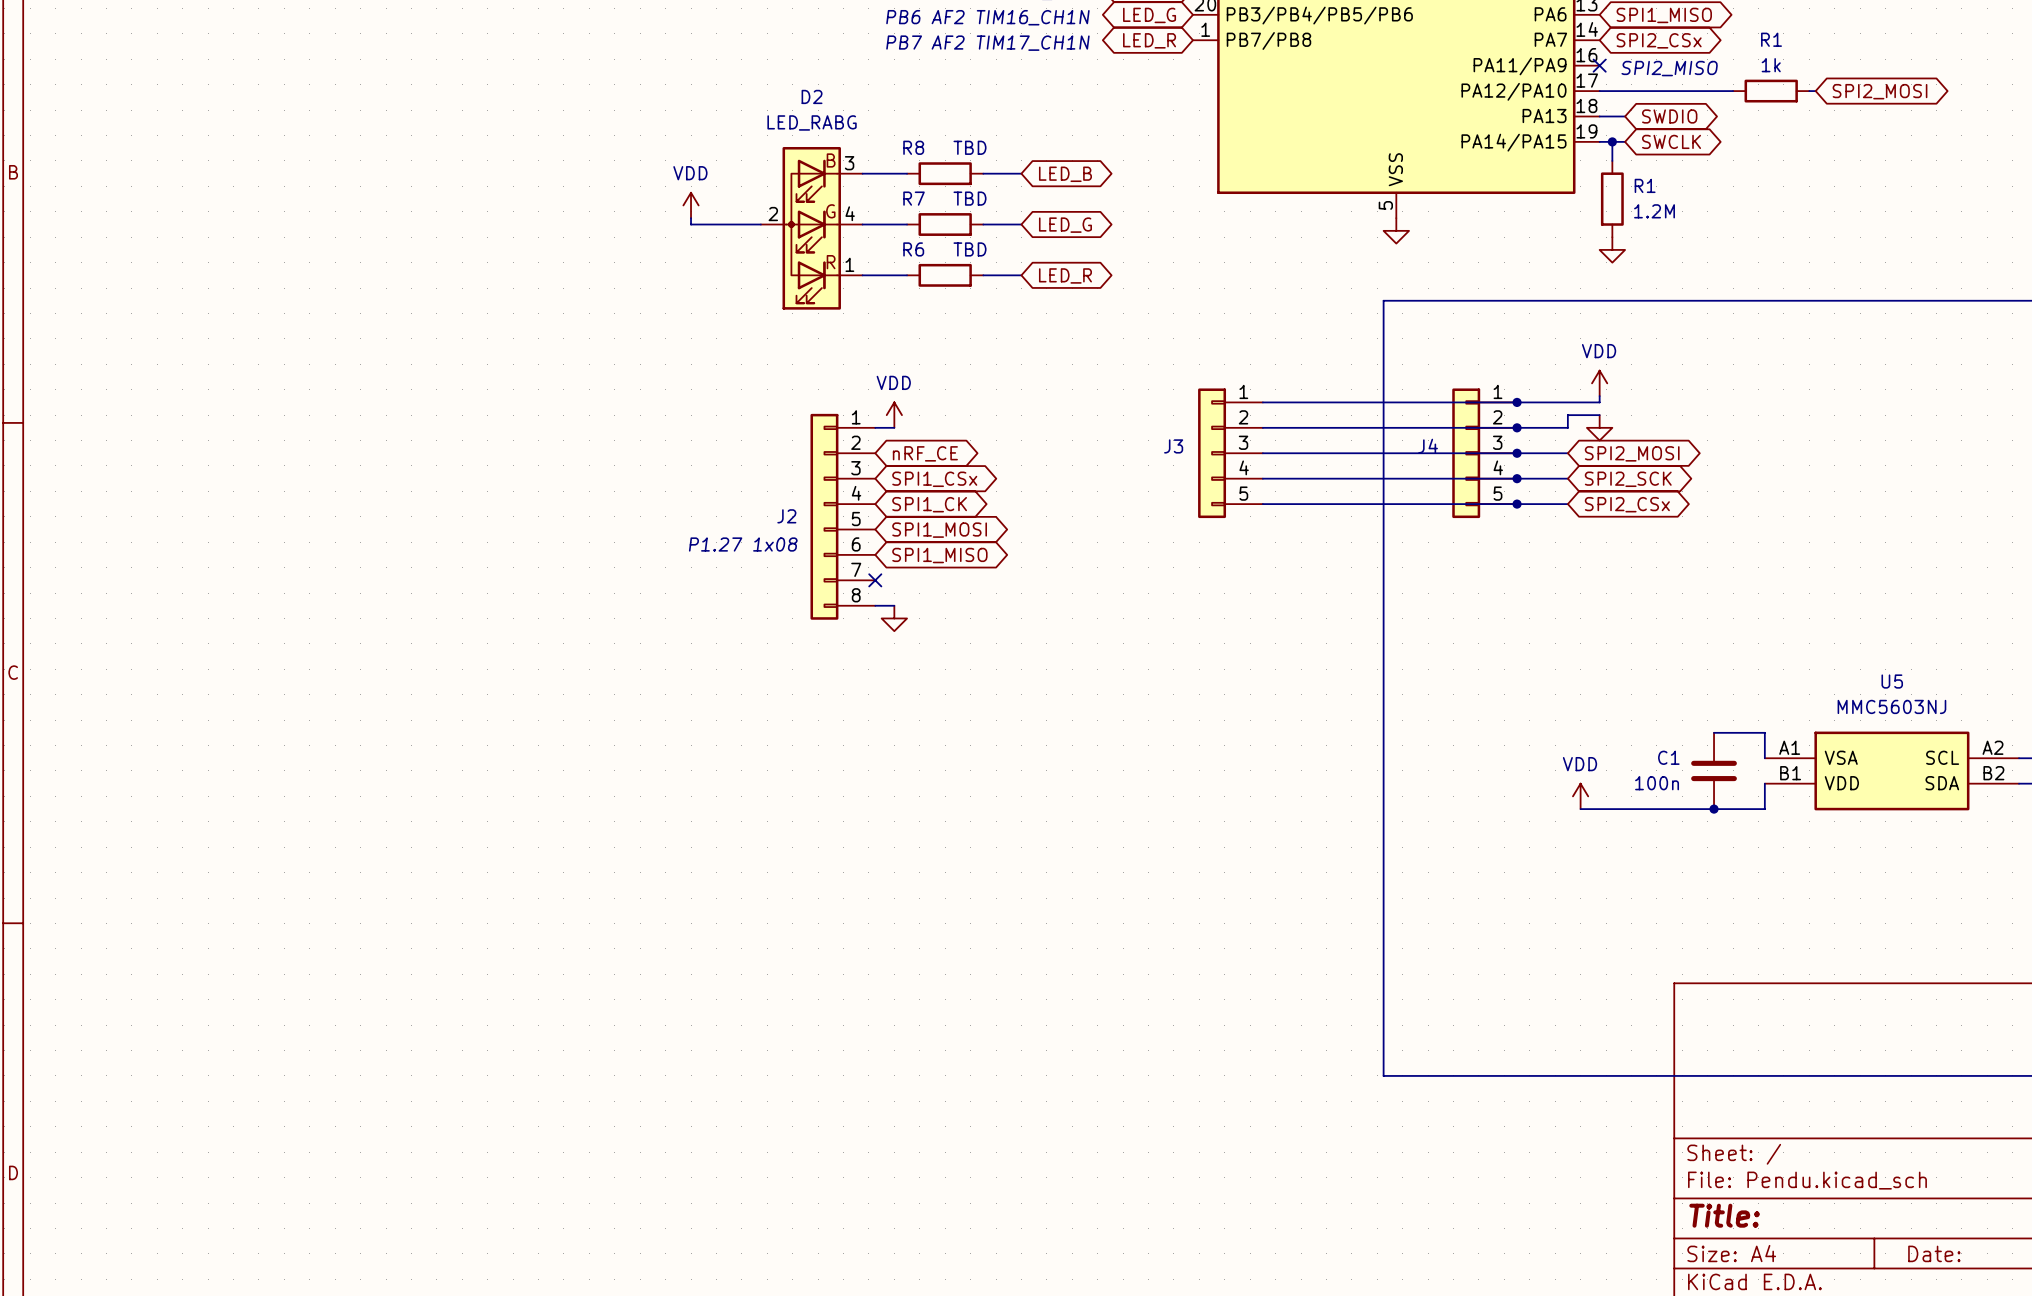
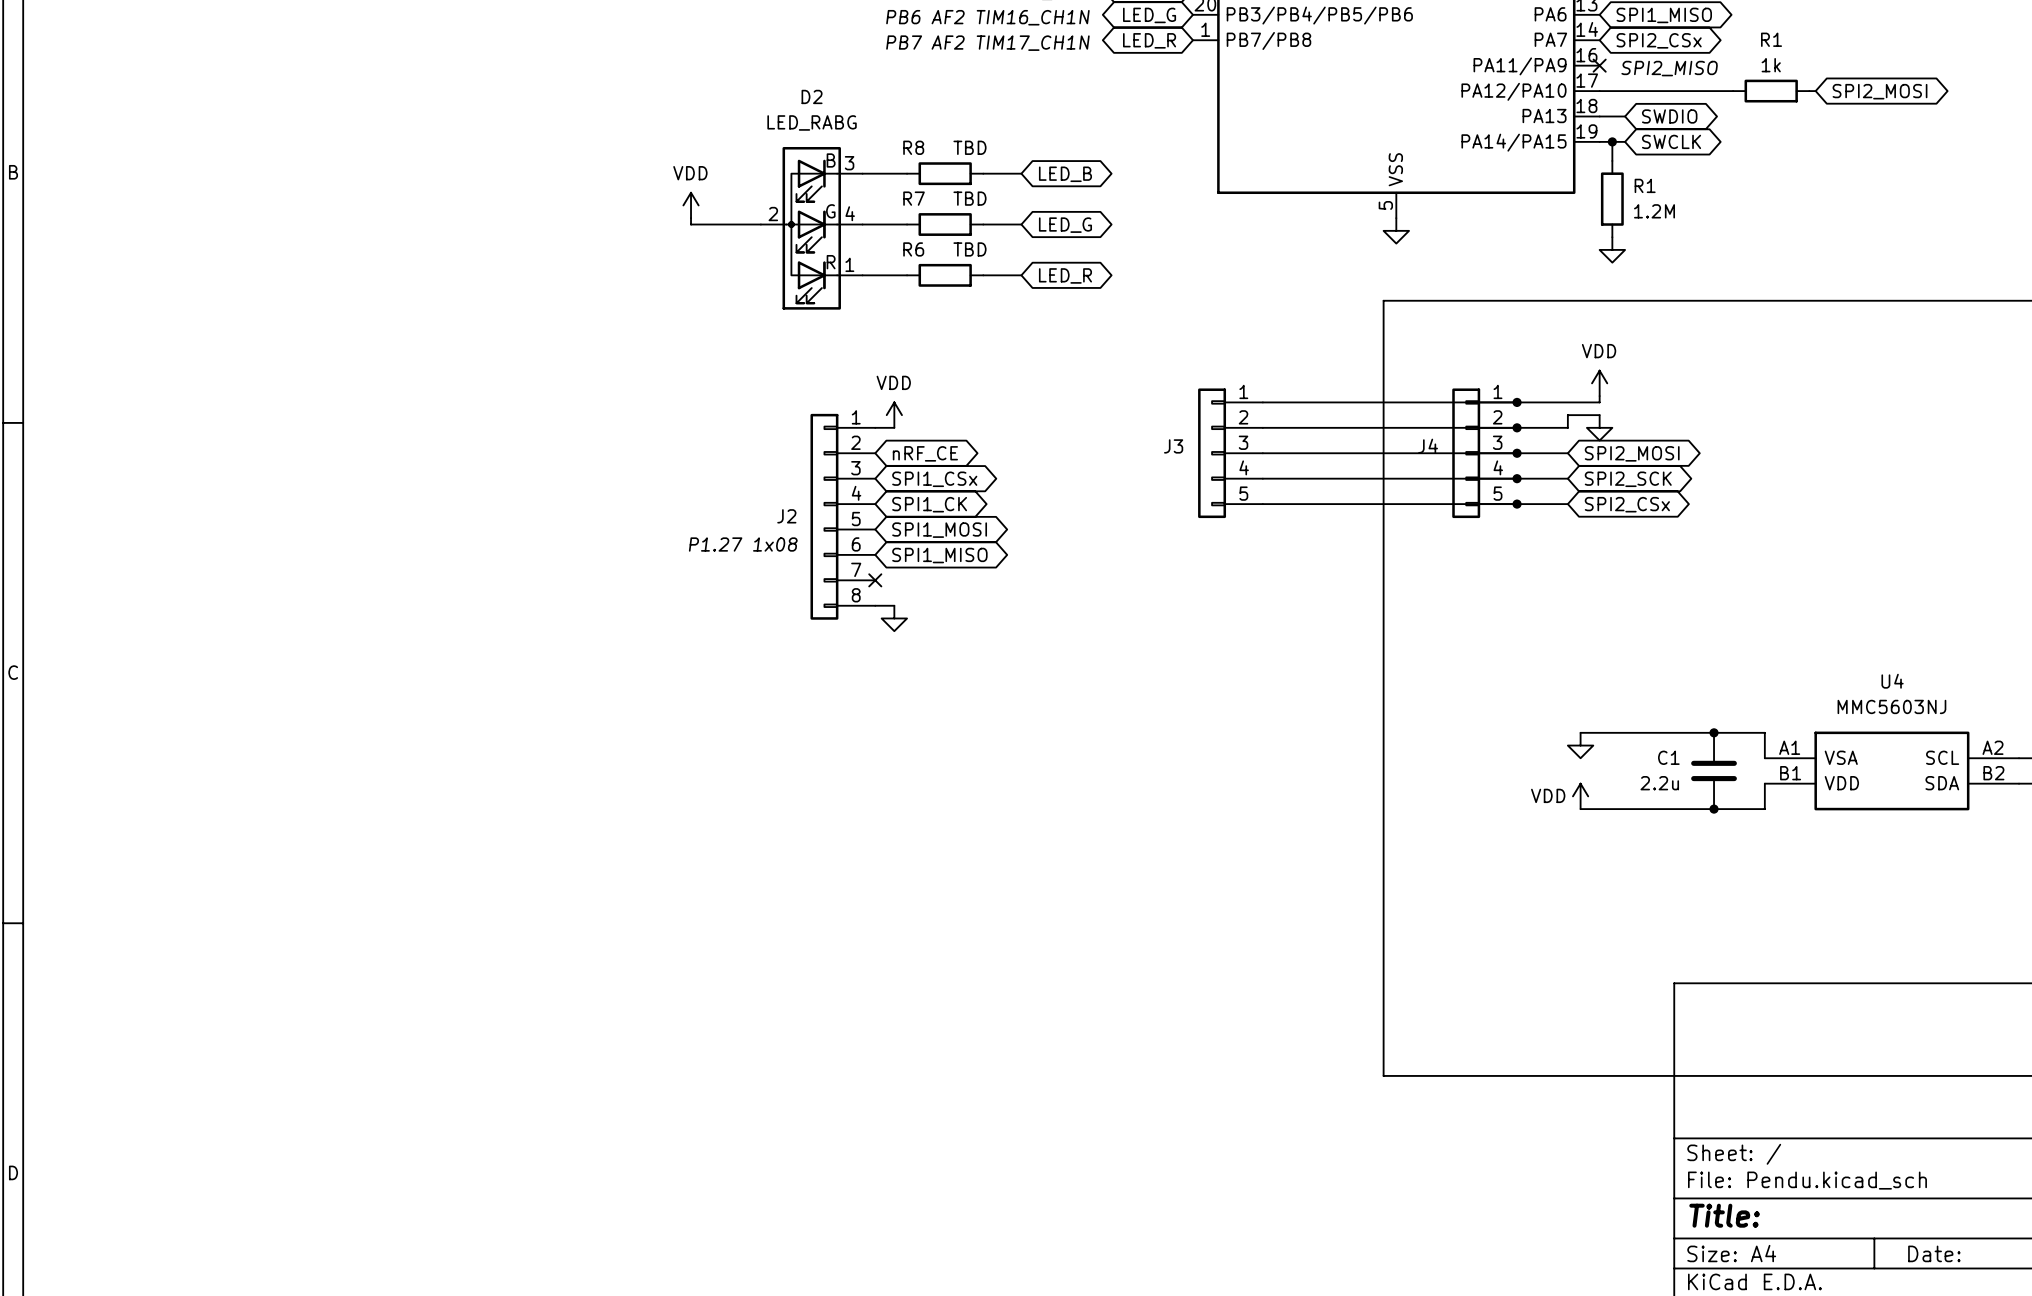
U5 name: U5 (1892, 681) -> U4 (1892, 681)
wire: none -> (1580, 732) (1714, 732)
junction: none -> (1714, 732)
power symbol: none -> (1580, 745)
power symbol text position: VDD (1579, 764) -> VDD (1548, 795)
C1 value: 100n (1657, 783) -> 2.2u (1659, 783)

